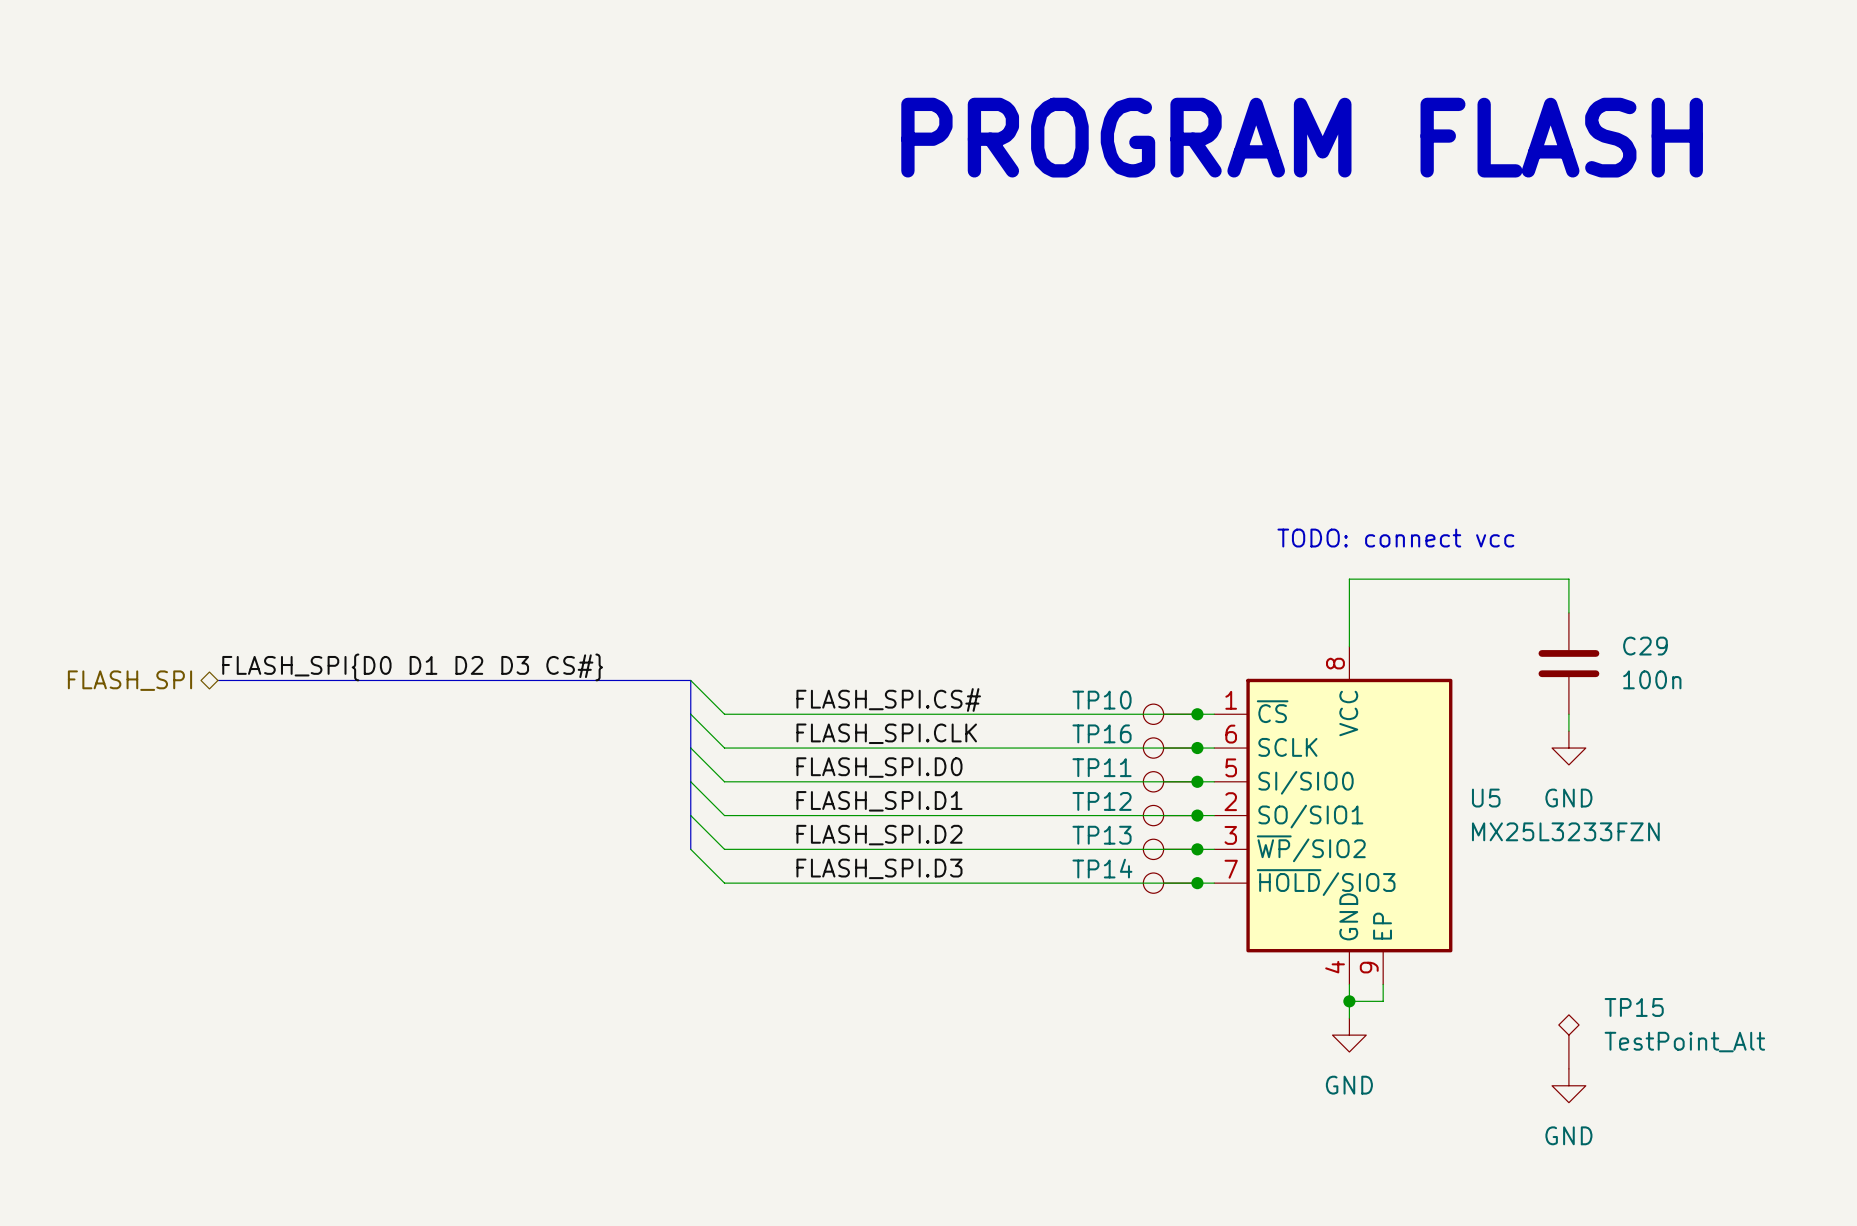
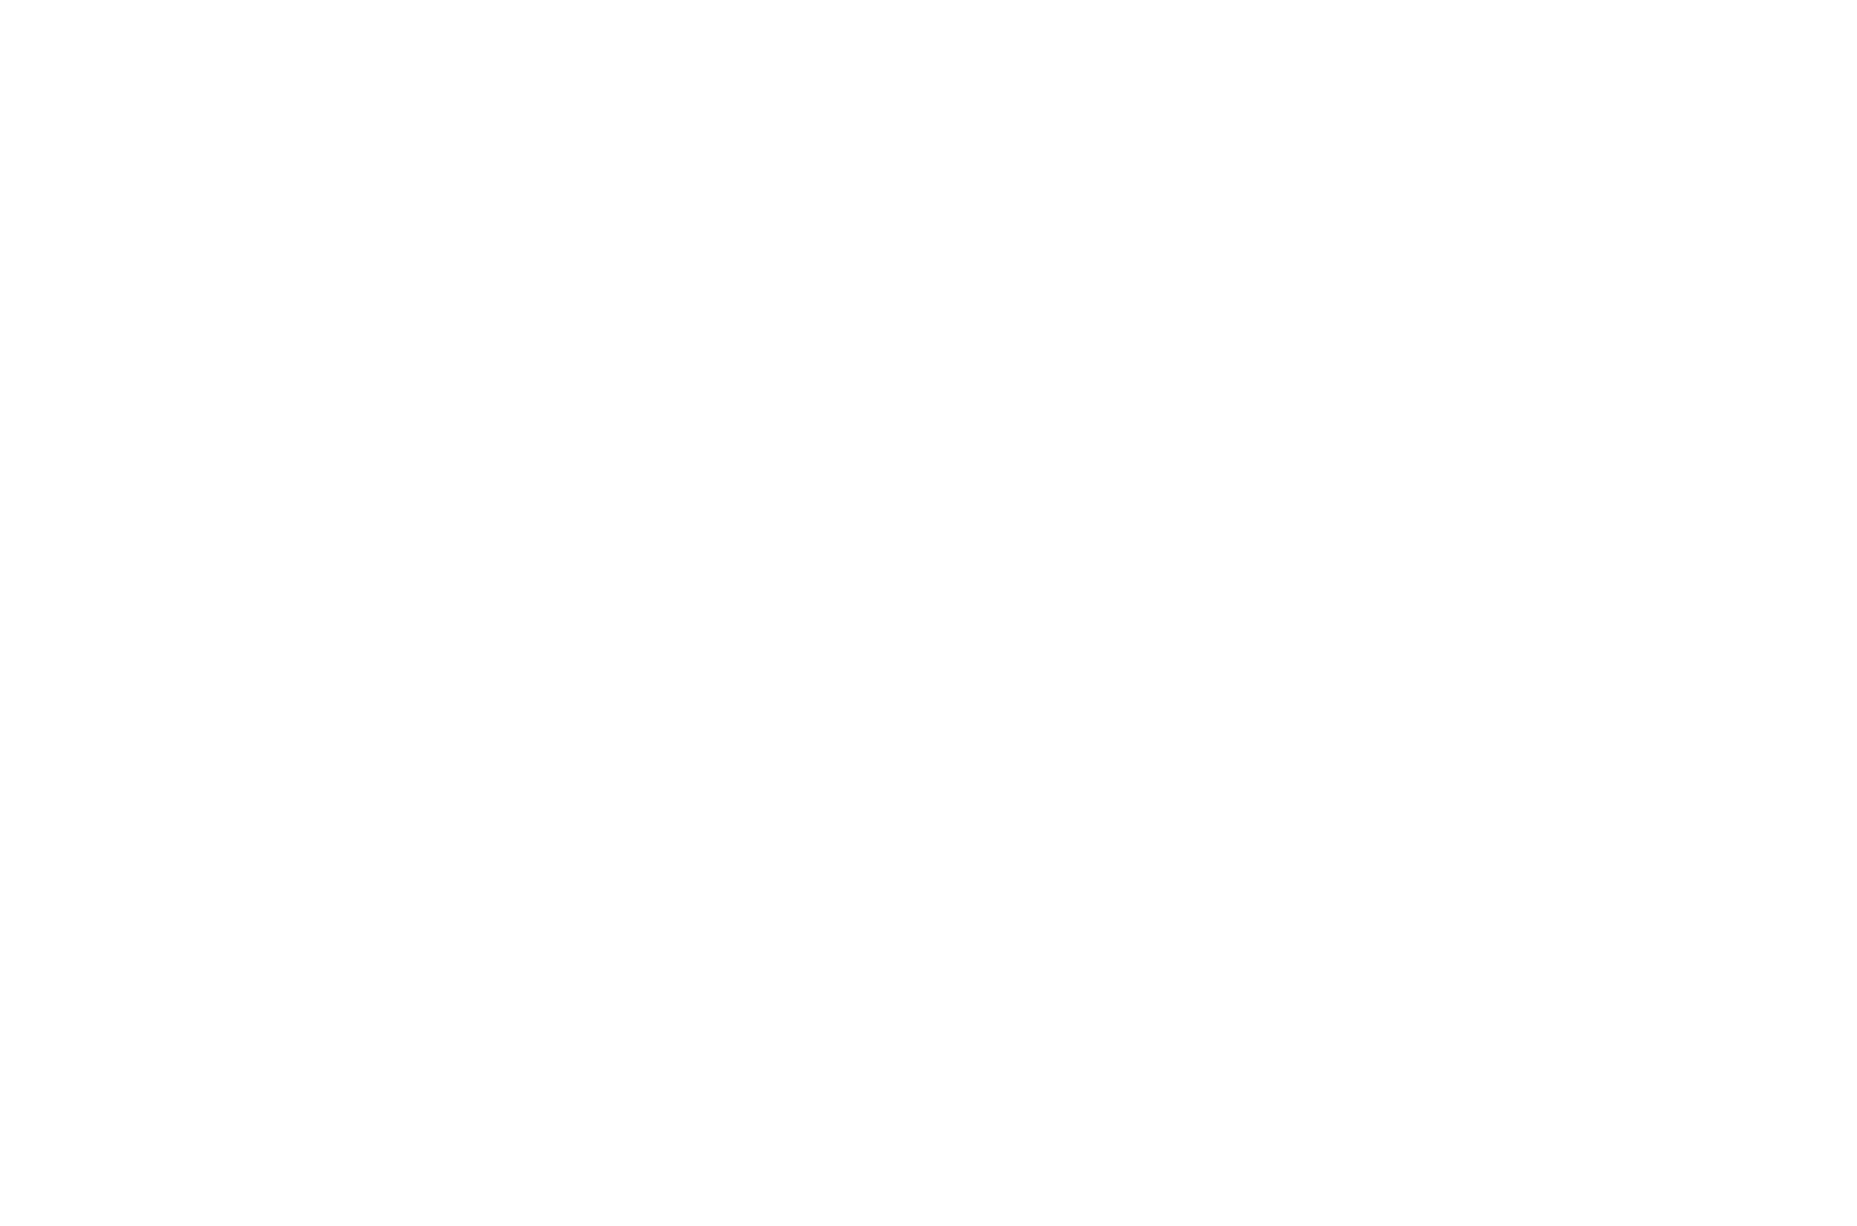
text: PROGRAM FLASH (1302, 137) -> none
text: TODO: connect vcc (1395, 538) -> none
wire: (1568, 612) (1568, 579) (1349, 579) (1349, 646) -> none
C29: 100n (1568, 663) -> none
label: FLASH_SPI{D0 D1 D2 D3 CS#} (412, 667) -> none
hierarchical label: FLASH_SPI (129, 680) -> none
bus: (217, 680) (690, 680) (690, 849) -> none
wire: (690, 680) (724, 714) (1214, 714) -> none
label: FLASH_SPI.CS# (888, 699) -> none
wire: (690, 714) (724, 748) (1214, 748) -> none
TP10: (1170, 714) -> none
junction: (1197, 714) -> none
wire: (1568, 714) (1568, 731) -> none
label: FLASH_SPI.CLK (886, 733) -> none
wire: (690, 748) (724, 781) (1214, 781) -> none
TP16: (1170, 748) -> none
junction: (1197, 748) -> none
power symbol: GND (1568, 748) -> none
label: FLASH_SPI.D0 (879, 767) -> none
wire: (690, 781) (724, 815) (1214, 815) -> none
TP11: (1170, 781) -> none
junction: (1197, 781) -> none
label: FLASH_SPI.D1 (879, 801) -> none
wire: (690, 815) (724, 849) (1214, 849) -> none
TP12: (1170, 815) -> none
junction: (1197, 815) -> none
U5: MX25L3233FZN (1333, 815) -> none
label: FLASH_SPI.D2 (879, 835) -> none
wire: (690, 849) (724, 883) (1214, 883) -> none
TP13: (1170, 849) -> none
junction: (1197, 849) -> none
label: FLASH_SPI.D3 (879, 868) -> none
TP14: (1170, 883) -> none
junction: (1197, 883) -> none
wire: (1349, 984) (1349, 1018) -> none
wire: (1383, 984) (1383, 1001) (1349, 1001) -> none
junction: (1349, 1001) -> none
power symbol: GND (1349, 1035) -> none
TP15: TestPoint_Alt (1568, 1041) -> none
power symbol: GND (1568, 1085) -> none

